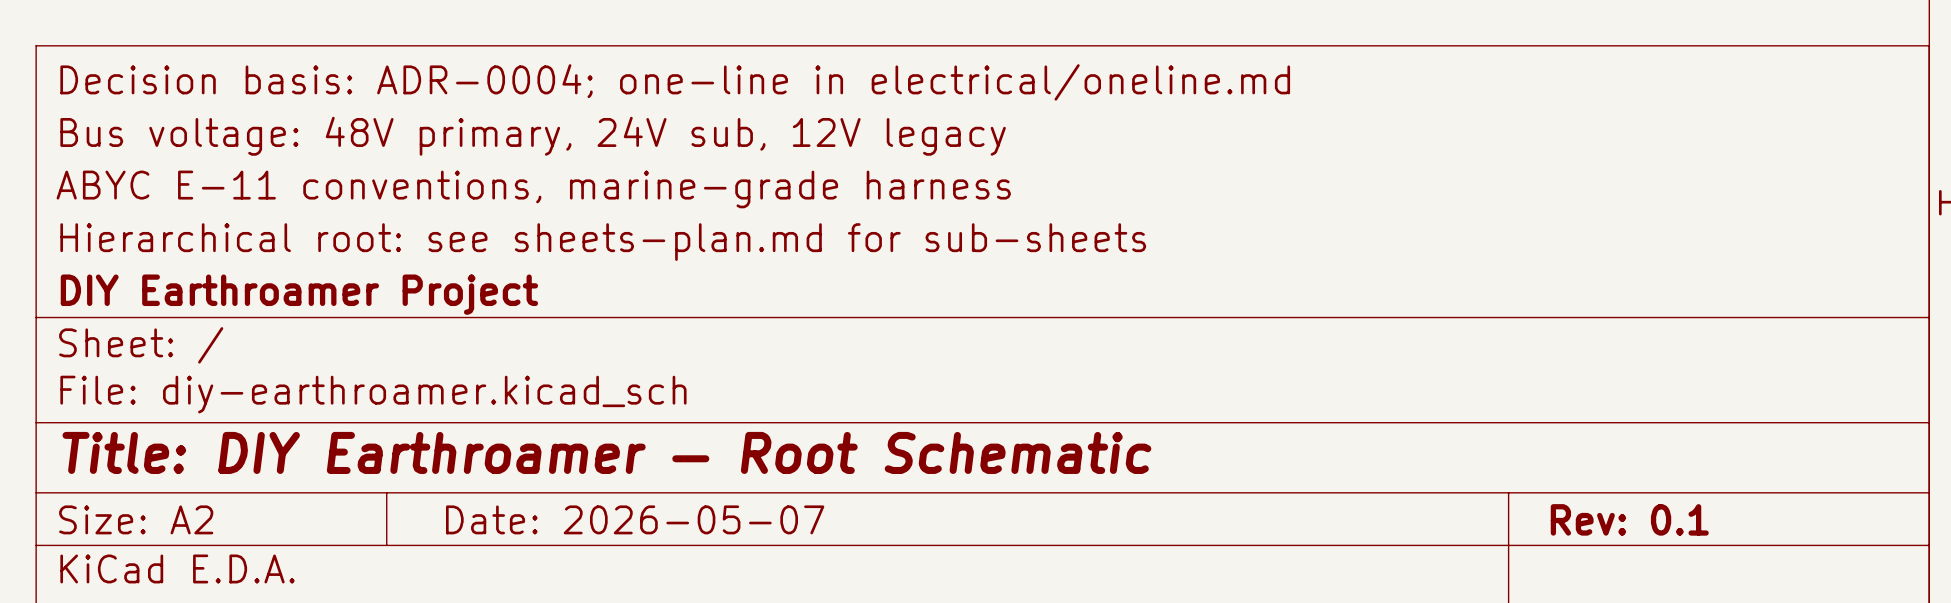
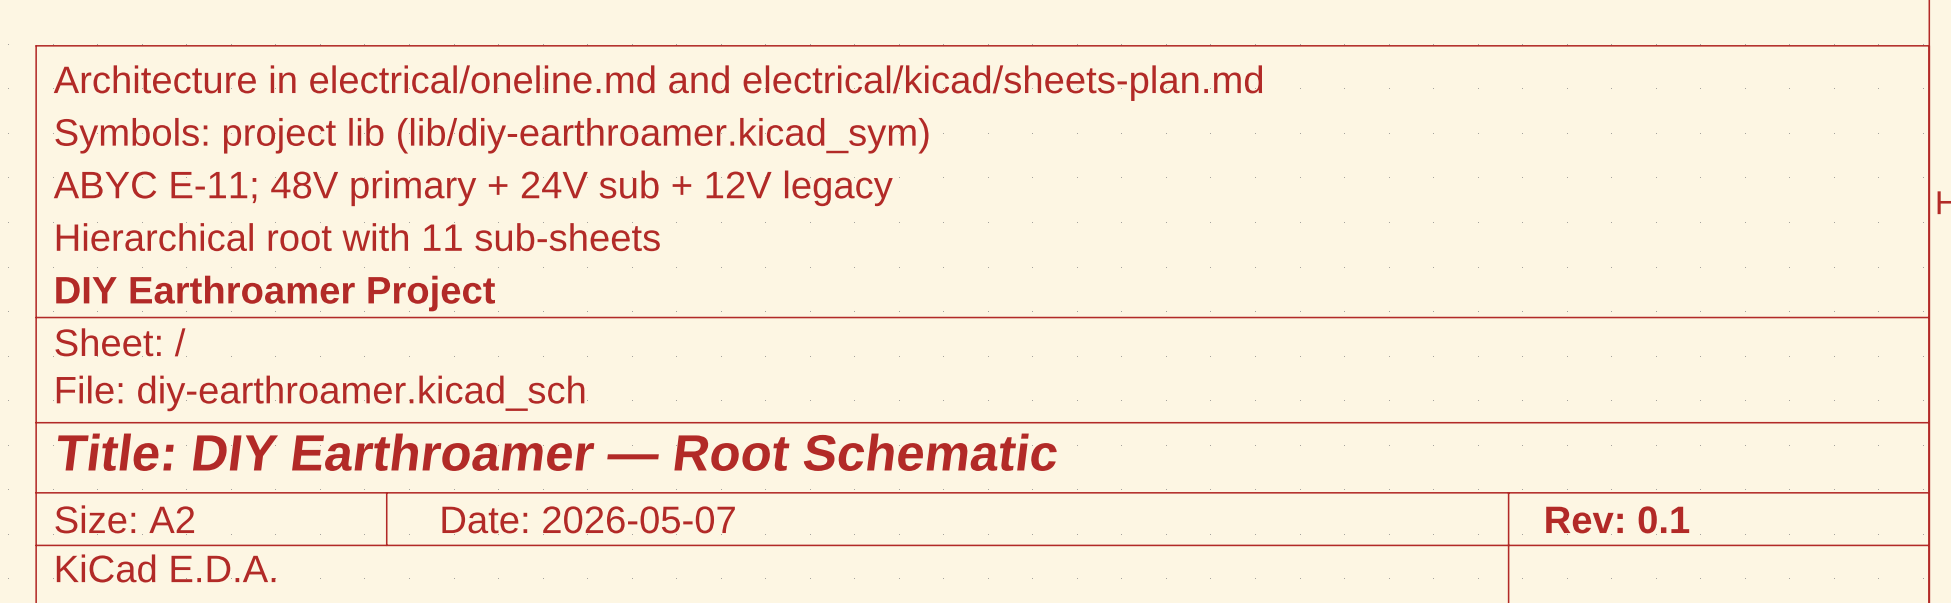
title block: Decision basis: ADR-0004; one-line in electrical/oneline.md (675, 82) -> Architecture in electrical/oneline.md and electrical/kicad/sheets-plan.md (657, 83)
title block: Bus voltage: 48V primary, 24V sub, 12V legacy (533, 136) -> Symbols: project lib (lib/diy-earthroamer.kicad_sym) (491, 135)
title block: ABYC E-11 conventions, marine-grade harness (533, 189) -> ABYC E-11; 48V primary + 24V sub + 12V legacy (473, 188)
title block: Hierarchical root: see sheets-plan.md for sub-sheets (603, 242) -> Hierarchical root with 11 sub-sheets (358, 237)

